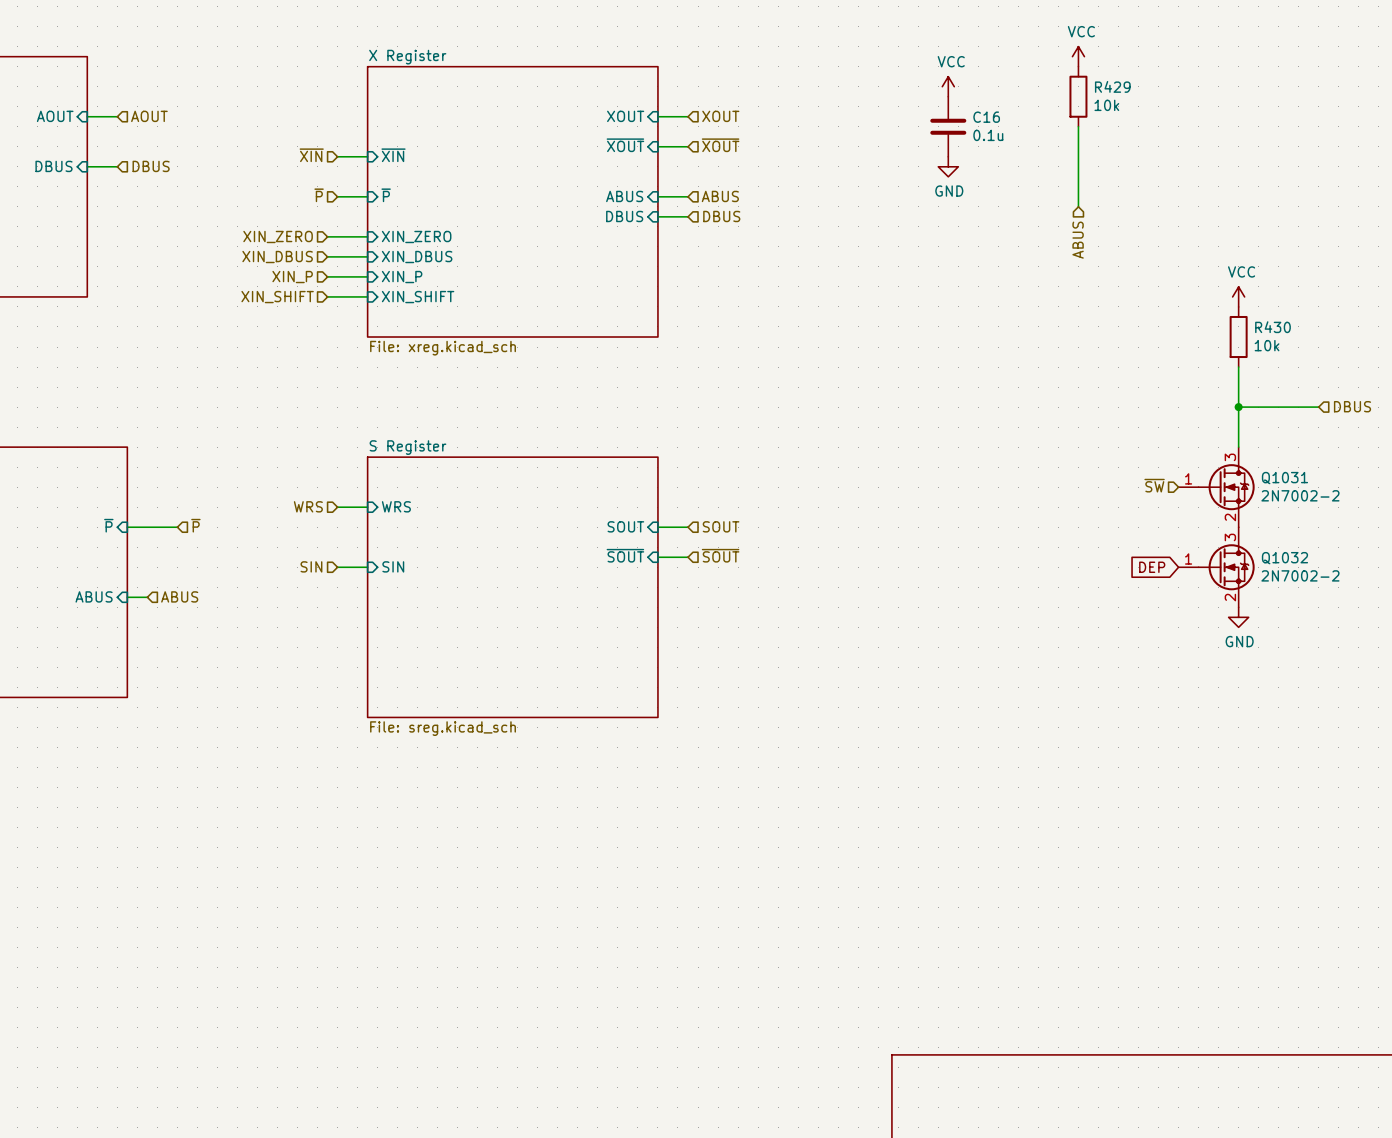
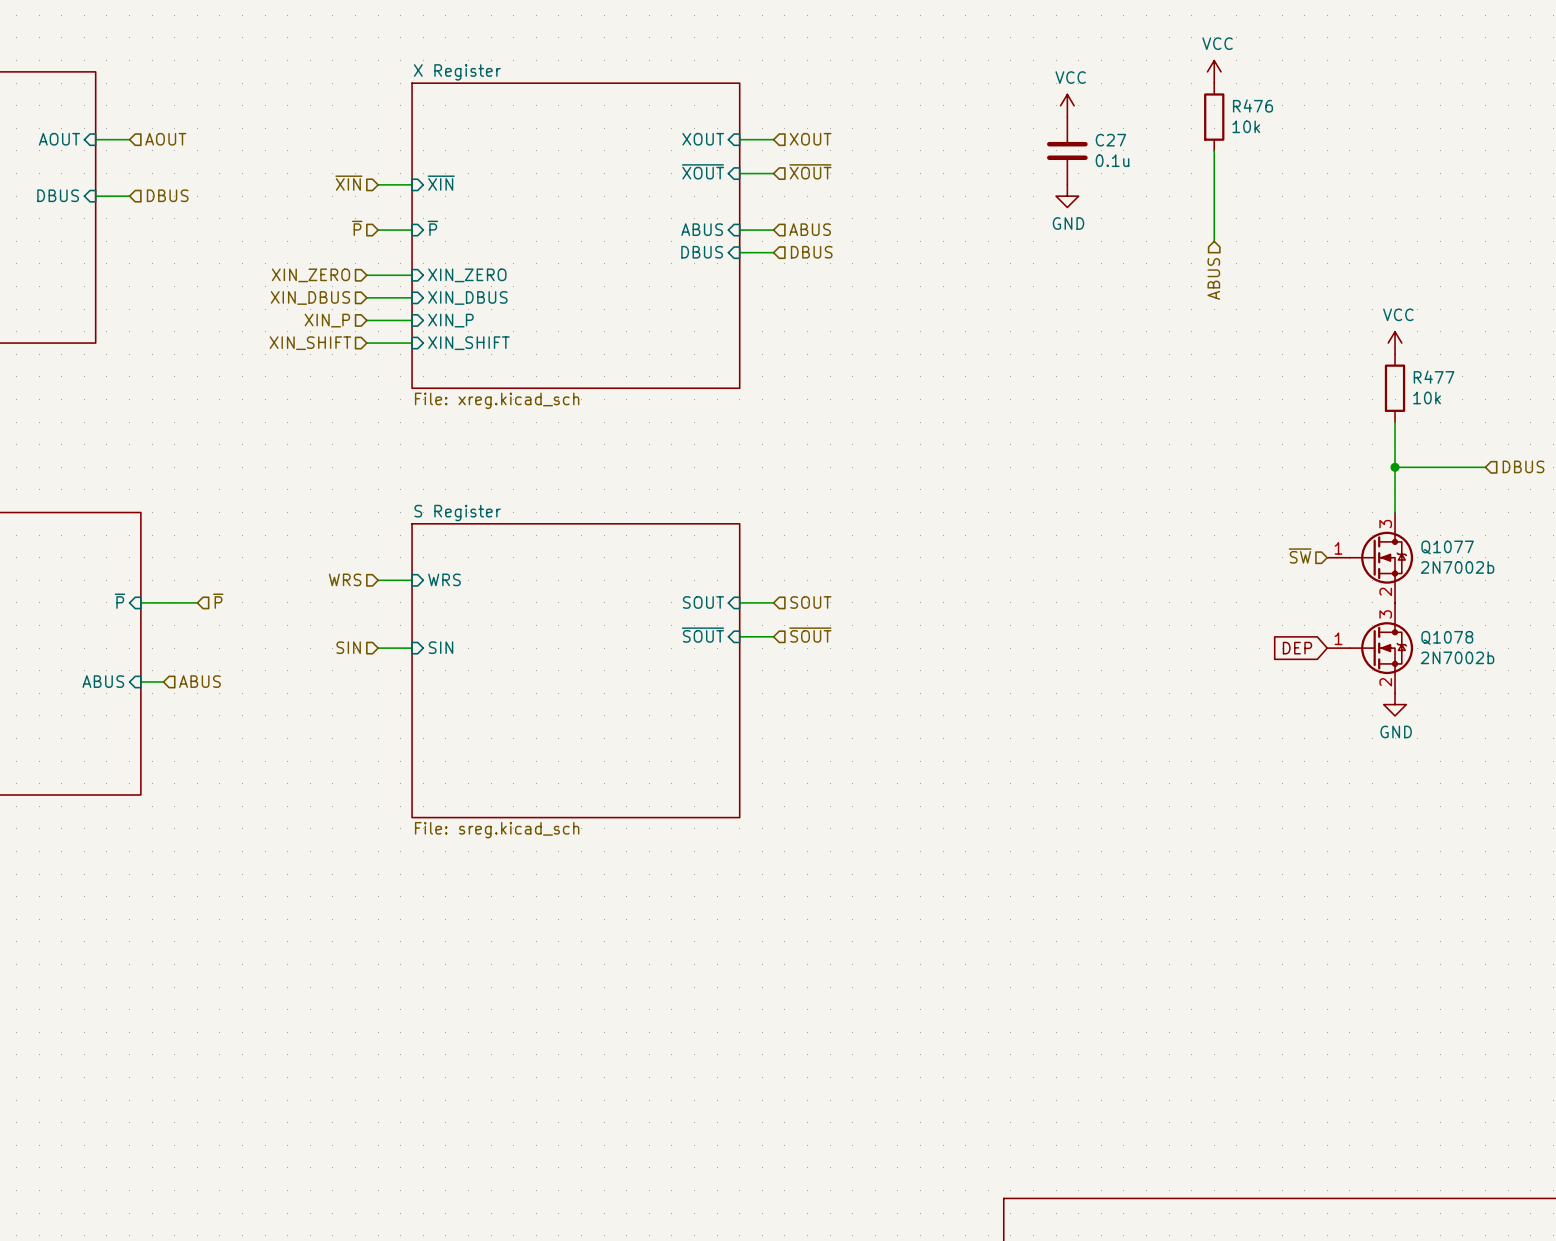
R429 name: R429 (1112, 86) -> R476 (1253, 105)
C16 name: C16 (986, 117) -> C27 (1110, 140)
R430 name: R430 (1272, 327) -> R477 (1434, 377)
Q1031 name: Q1031 (1284, 478) -> Q1077 (1447, 547)
Q1031 value: 2N7002-2 (1300, 495) -> 2N7002b (1457, 567)
Q1032 name: Q1032 (1284, 558) -> Q1078 (1447, 637)
Q1032 value: 2N7002-2 (1300, 575) -> 2N7002b (1457, 657)

